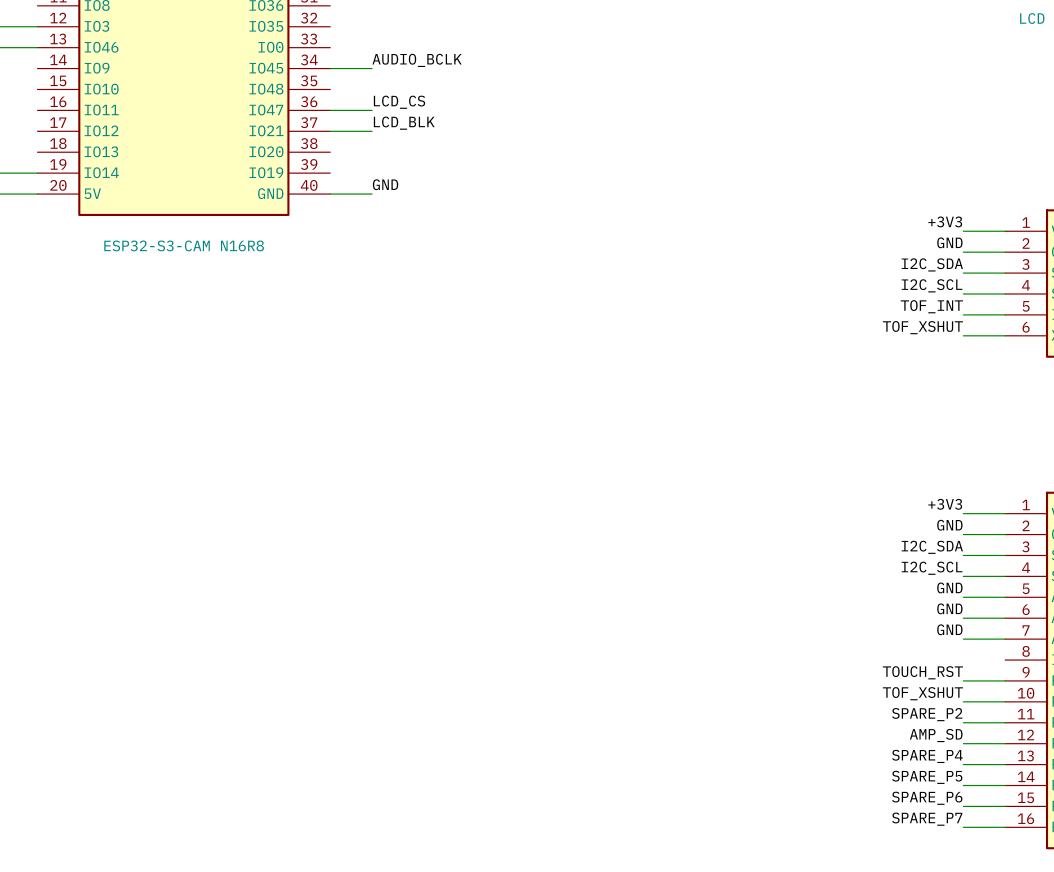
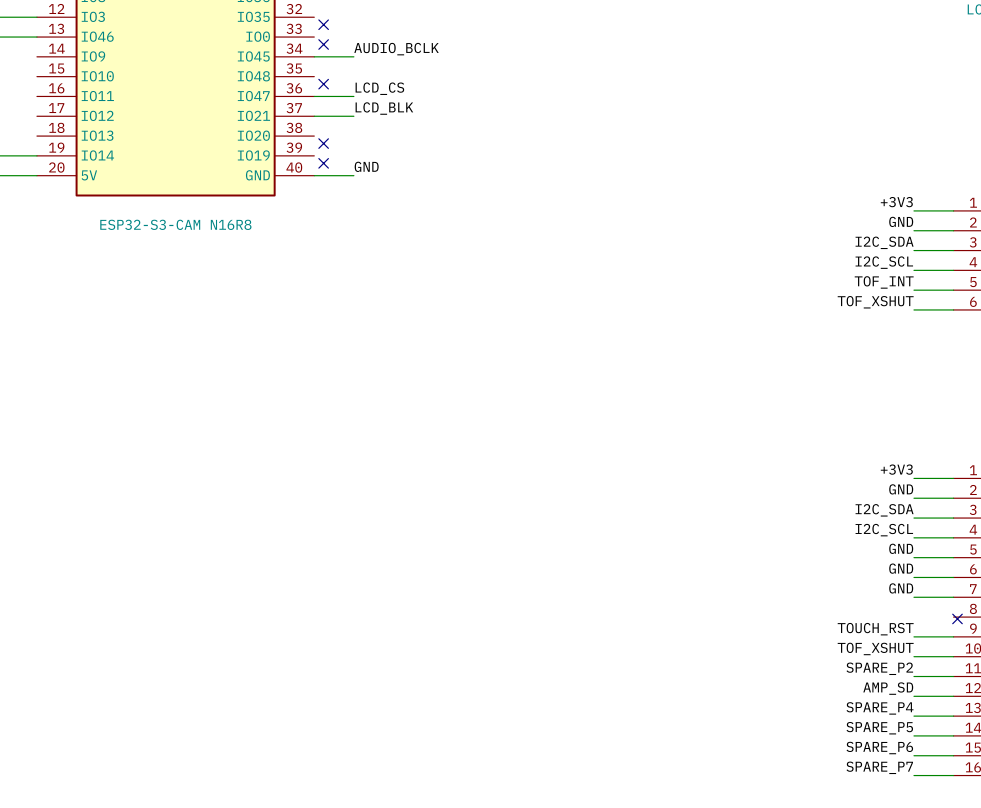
no-connect mark: none -> (323, 24)
no-connect mark: none -> (323, 44)
no-connect mark: none -> (323, 84)
no-connect mark: none -> (323, 143)
no-connect mark: none -> (323, 163)
no-connect mark: none -> (957, 618)

